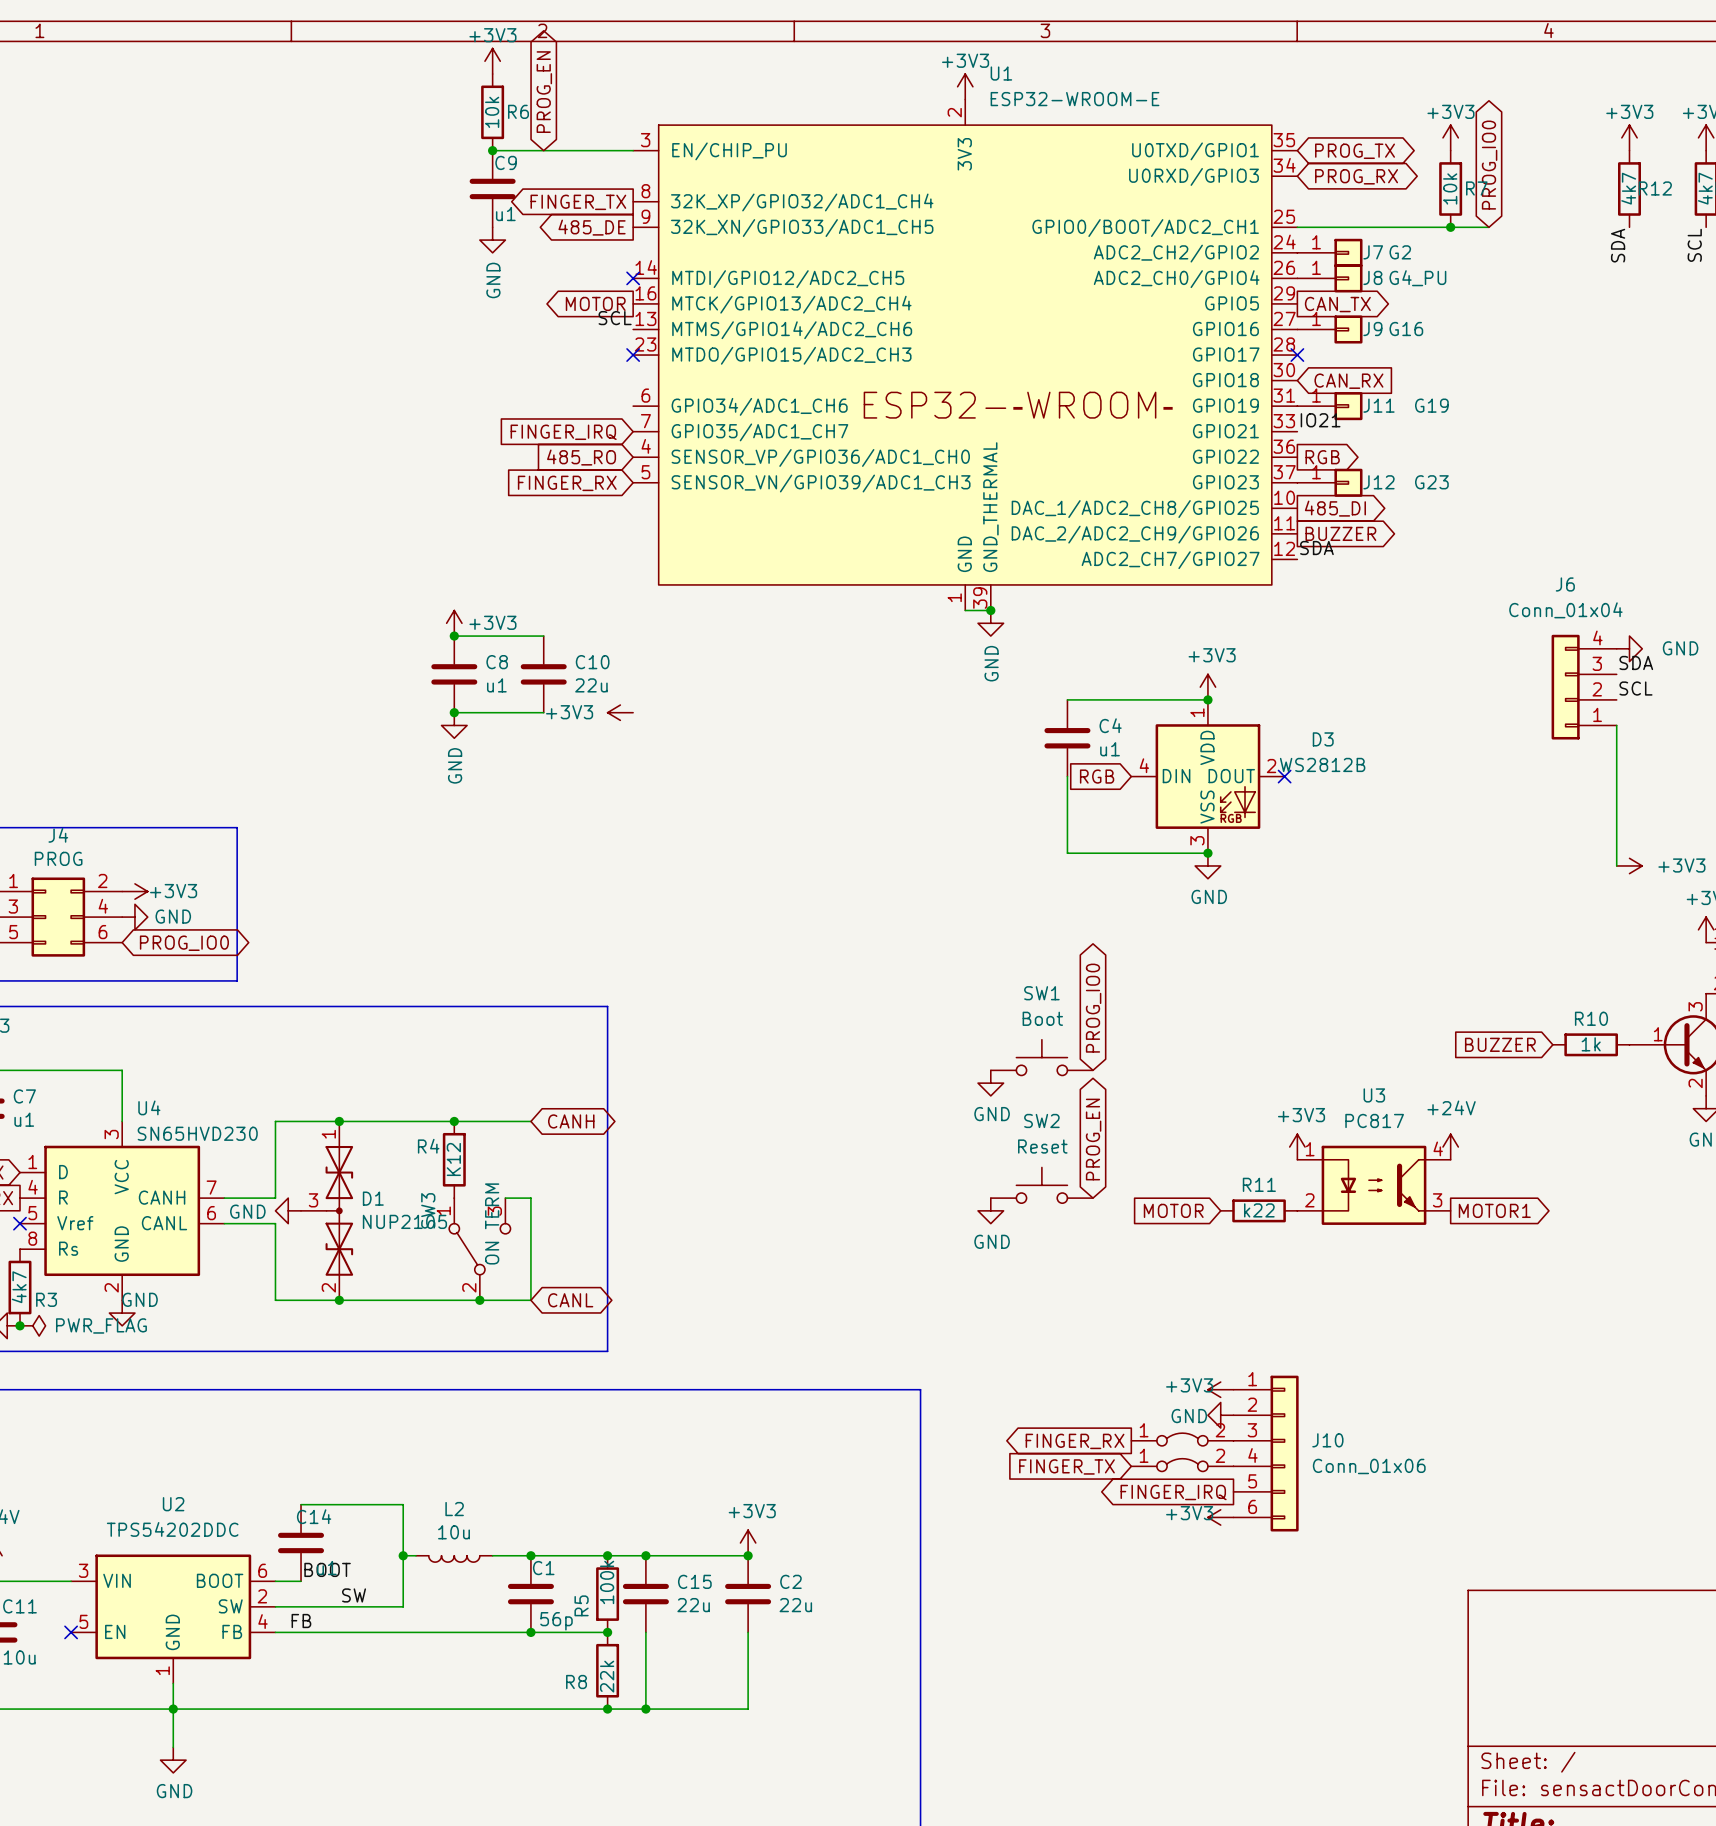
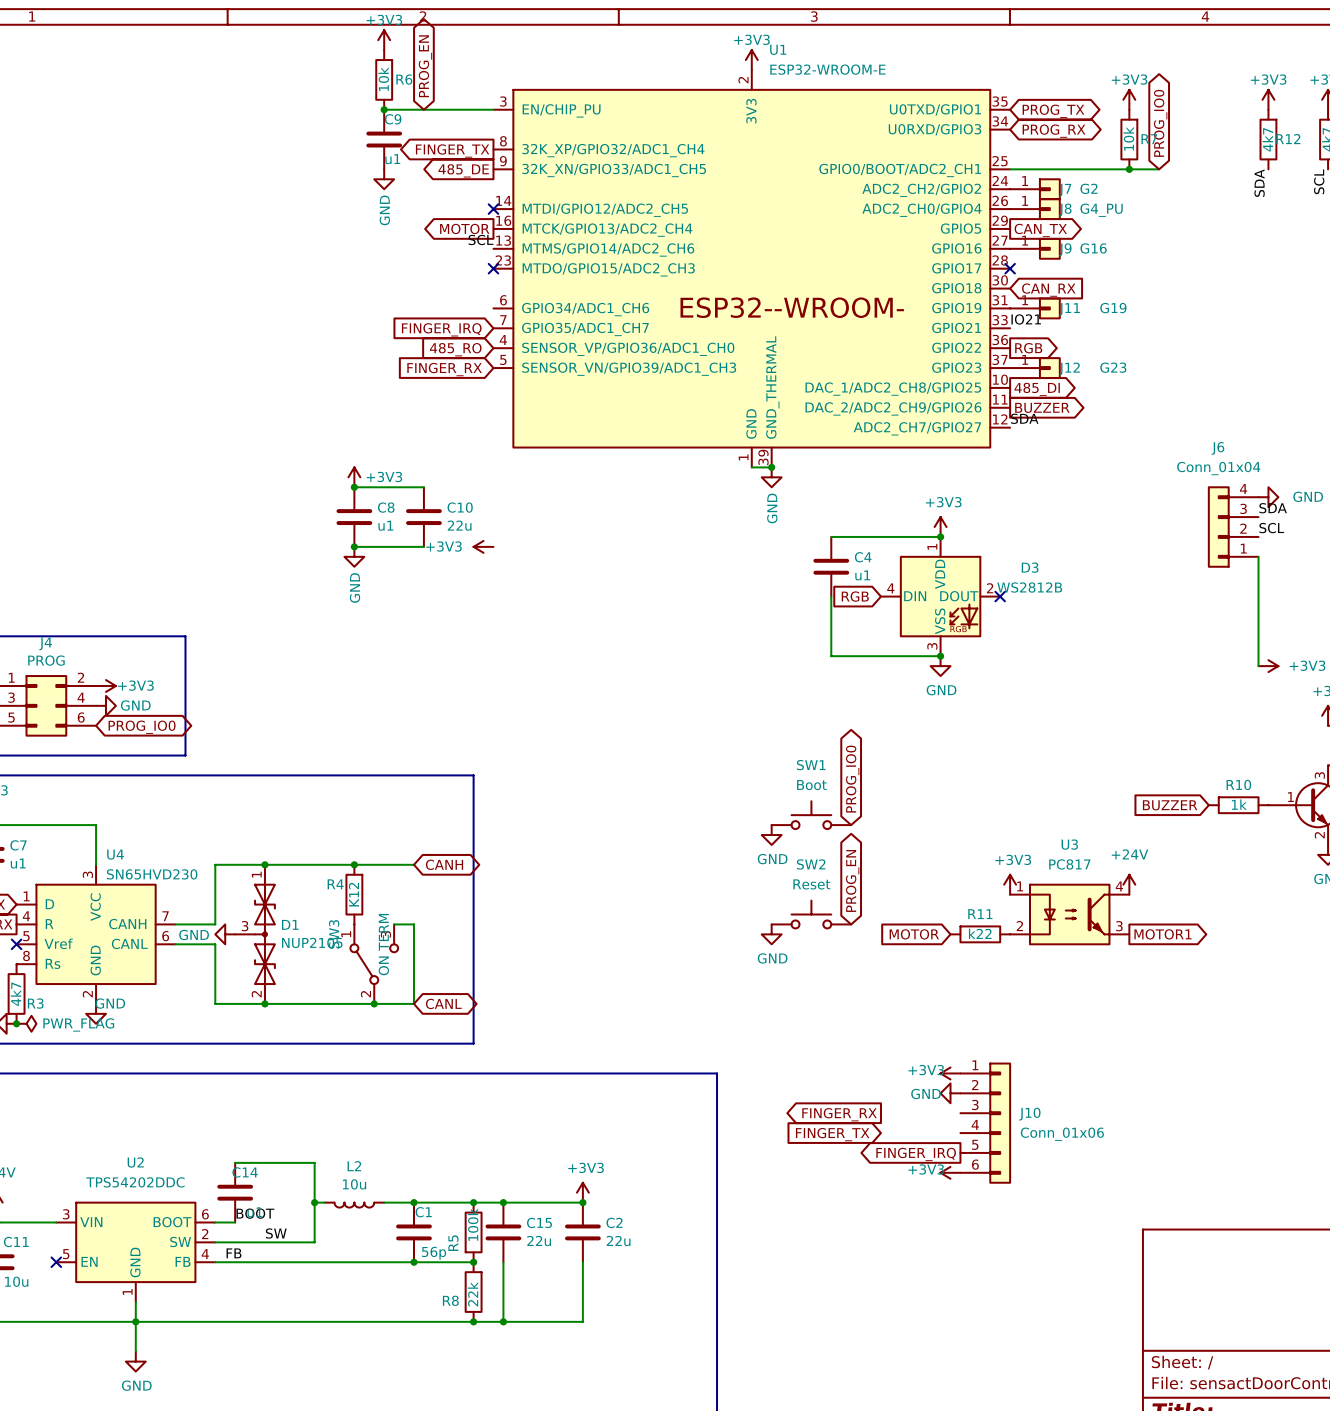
part: (1182, 1439) -> none
part: (1182, 1465) -> none

